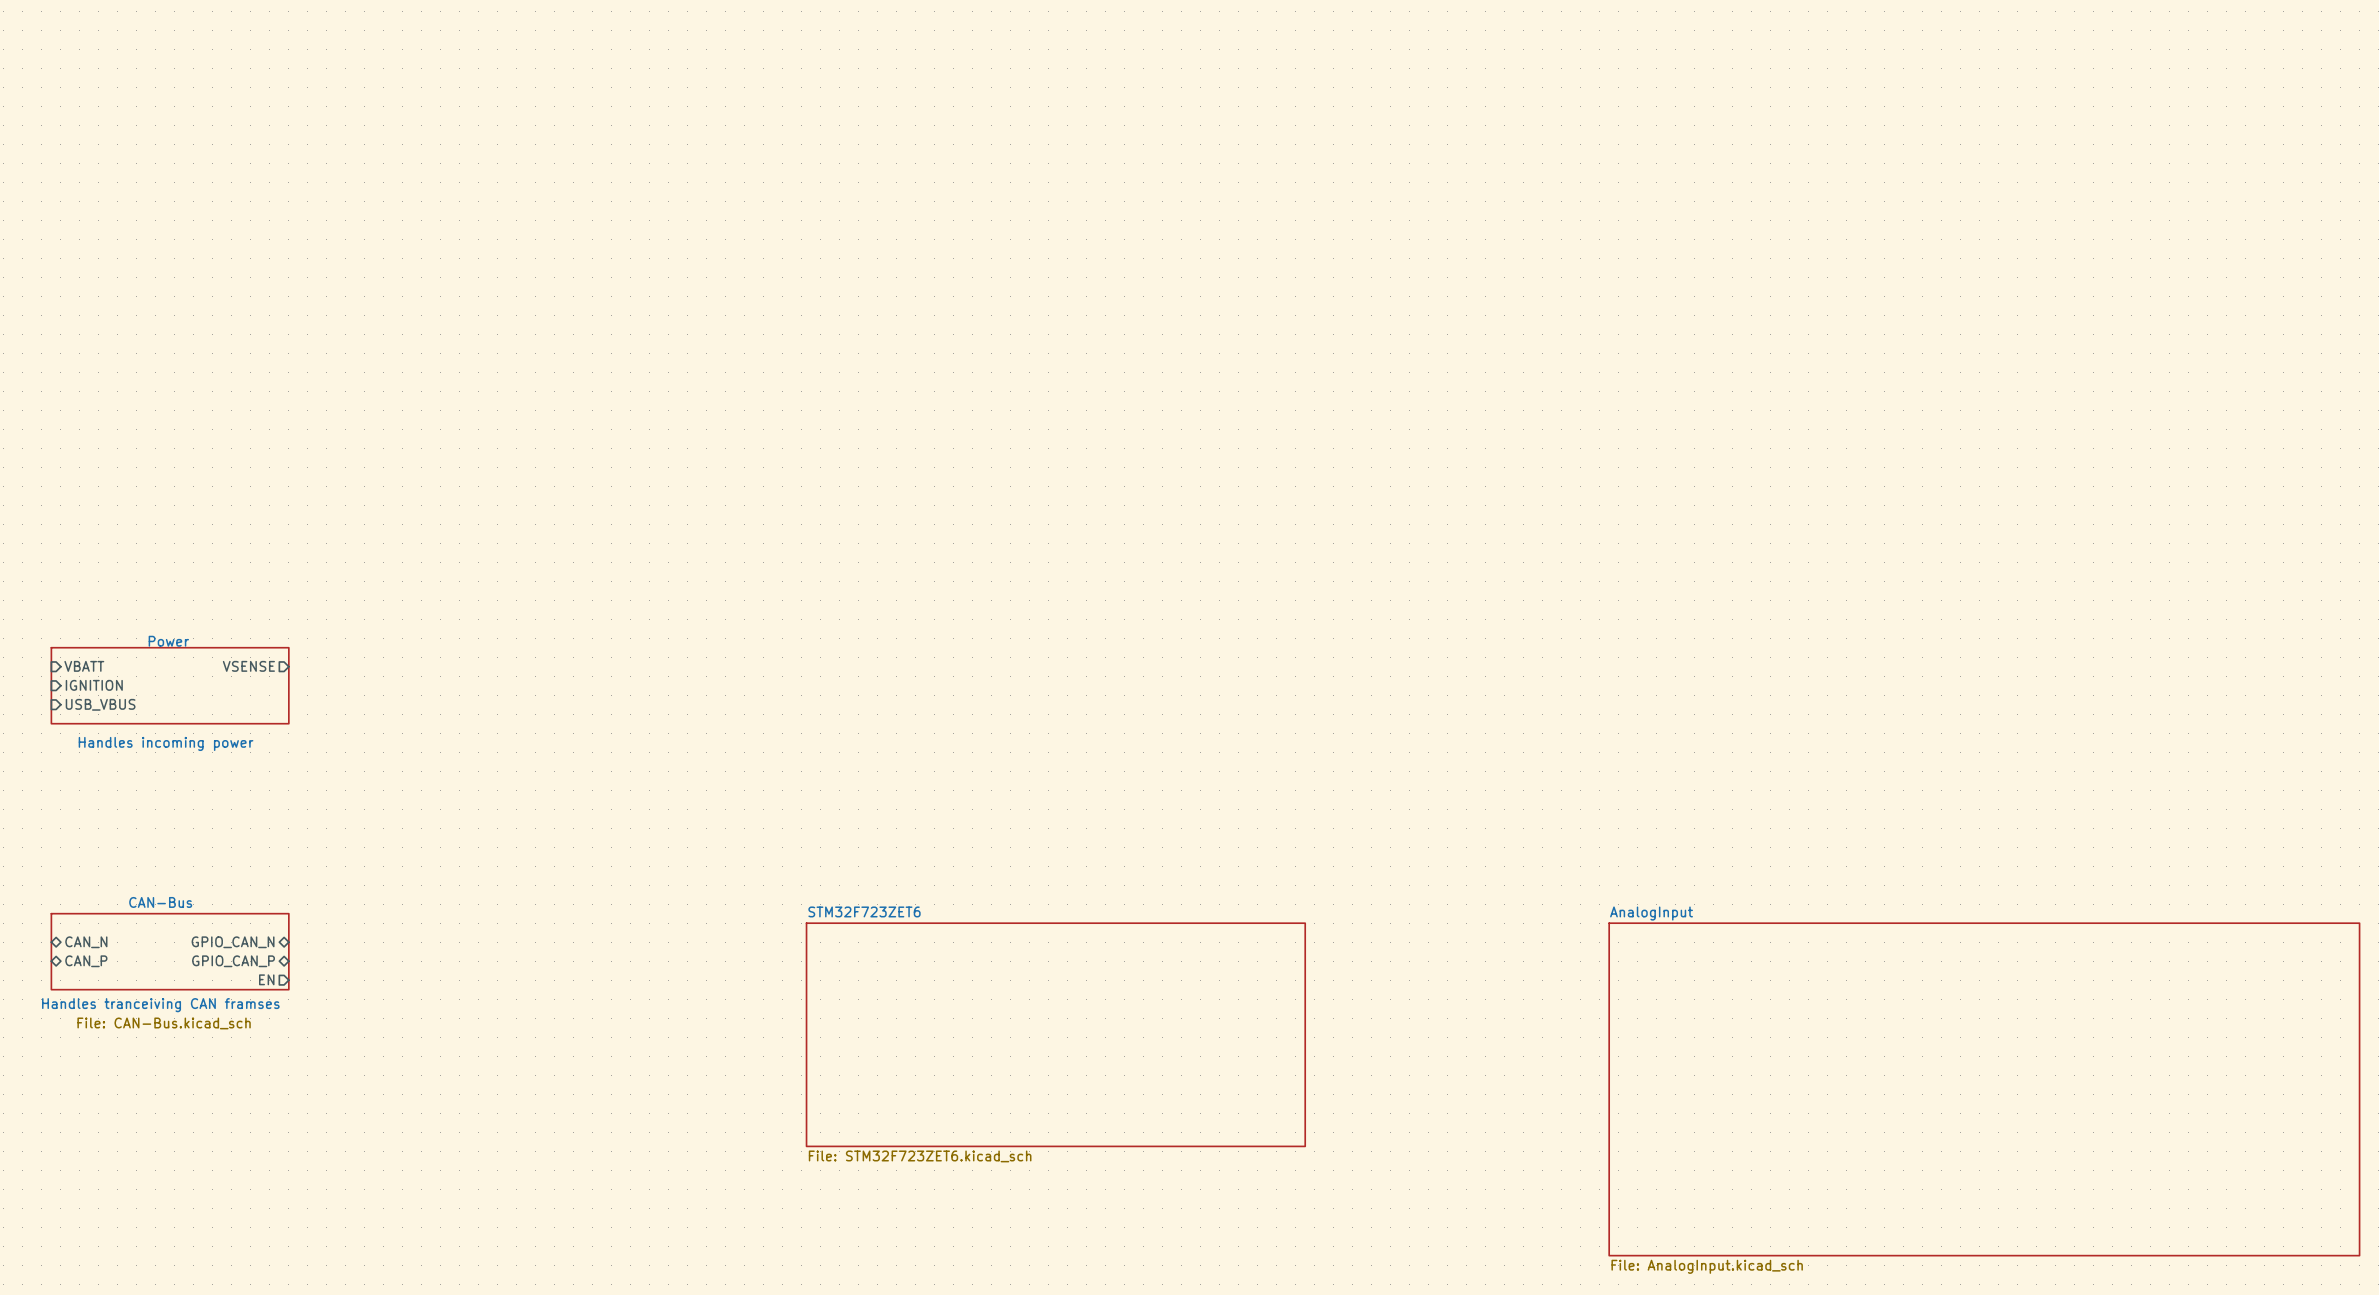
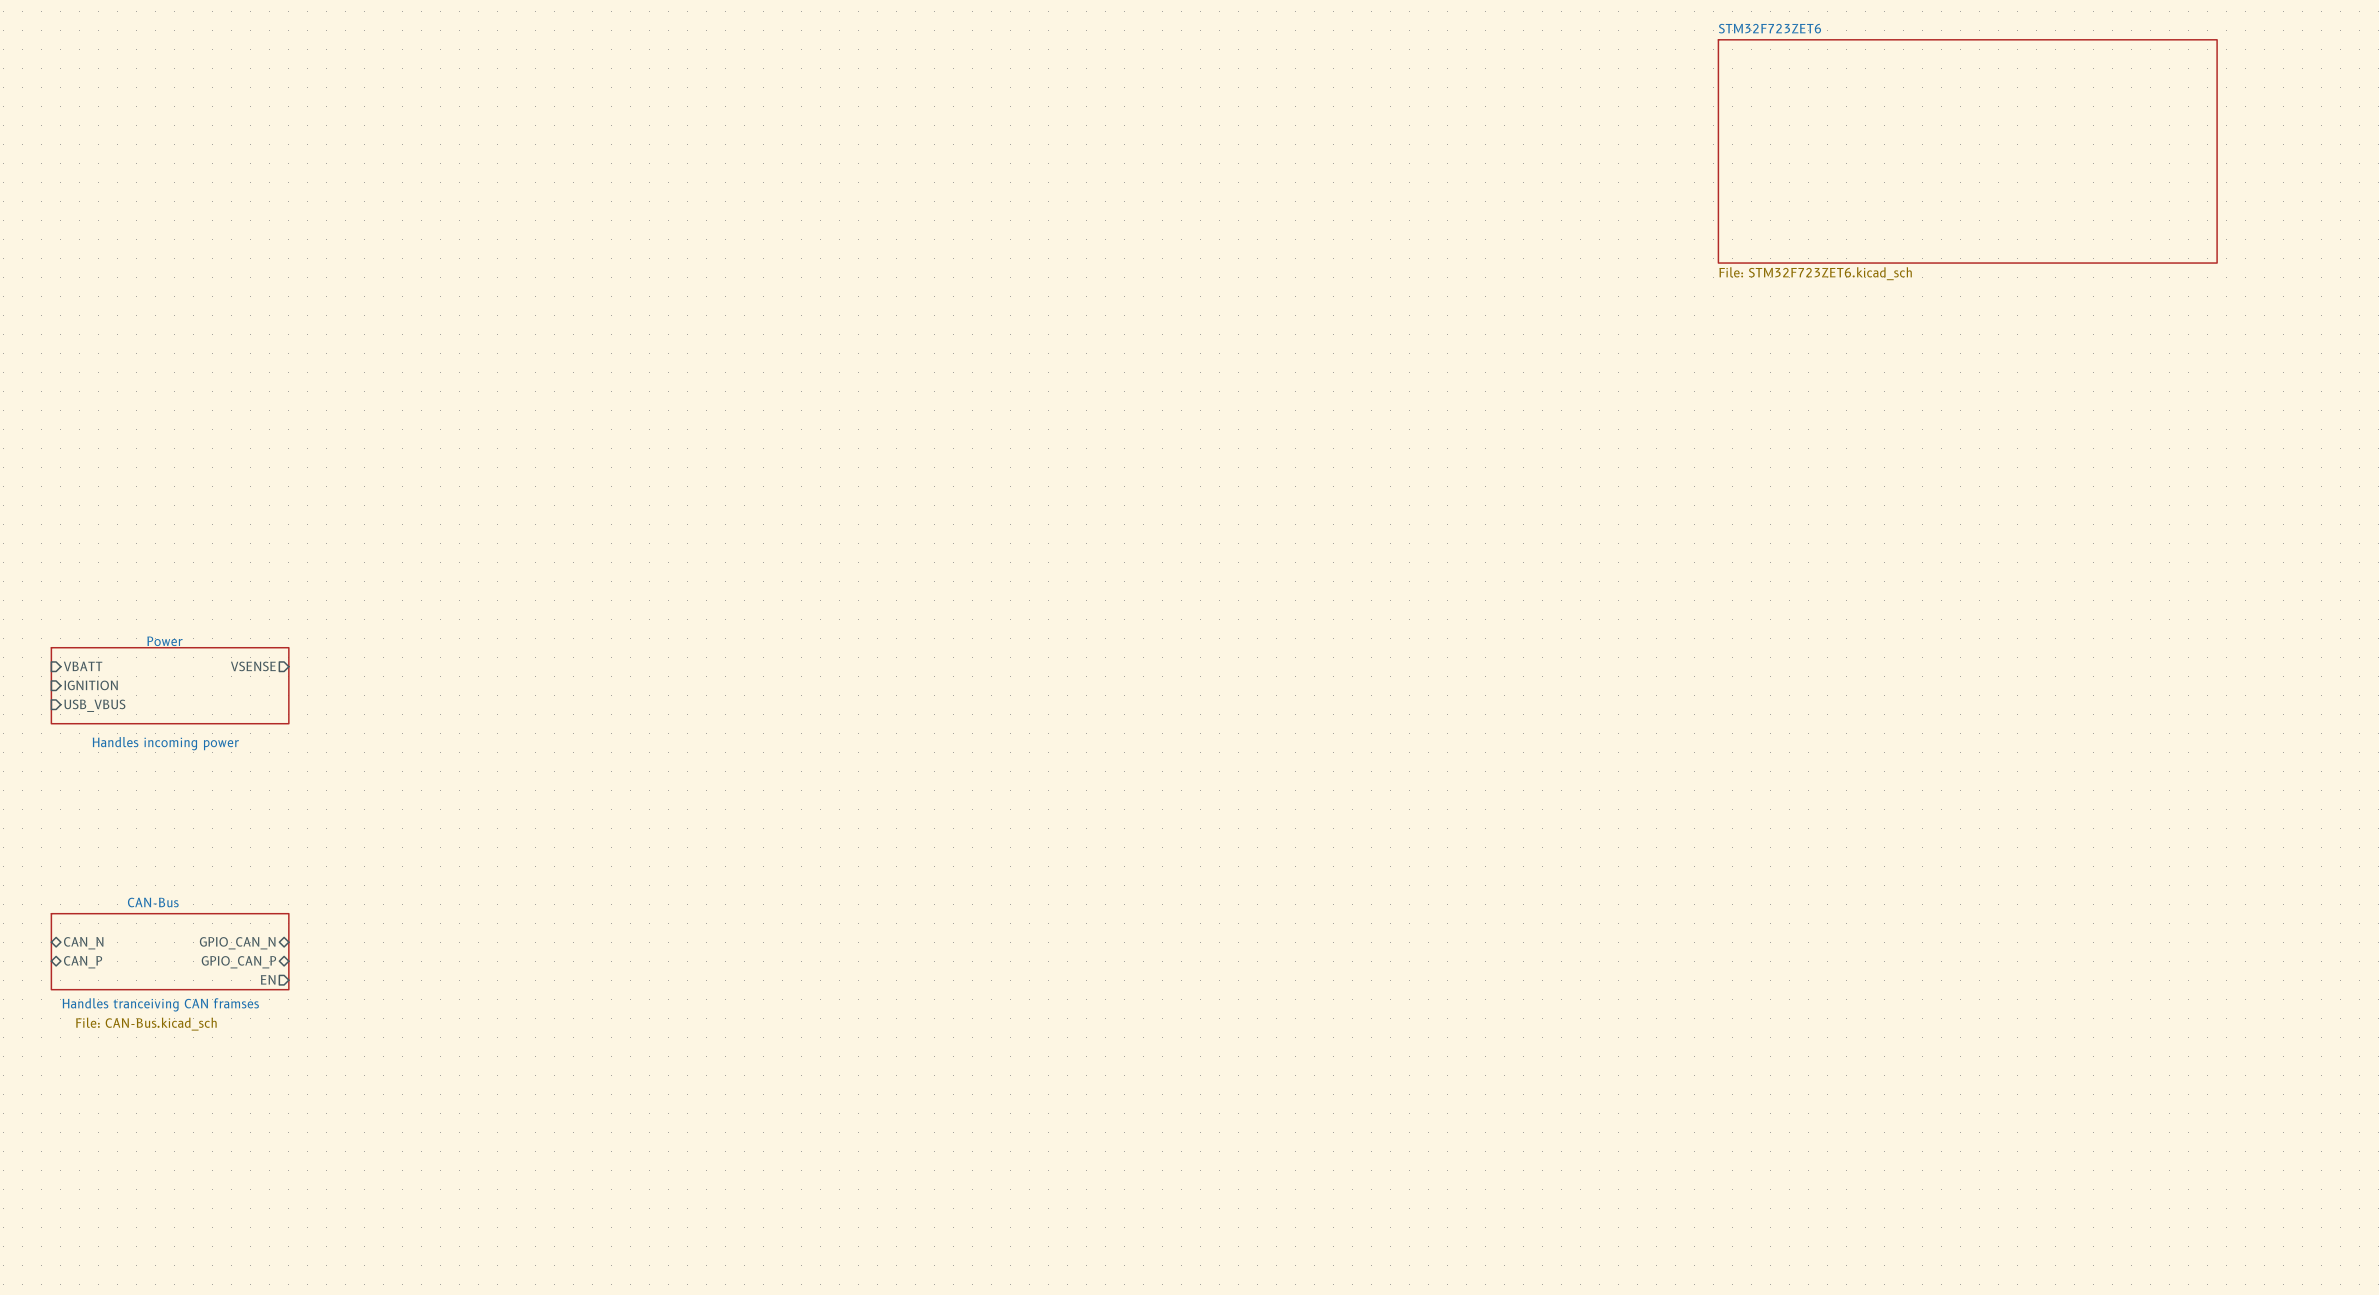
sheet STM32F723ZET6 position: (1055, 1034) -> (1967, 151)
sheet AnalogInput: File: AnalogInput.kicad_sch (1984, 1089) -> none

